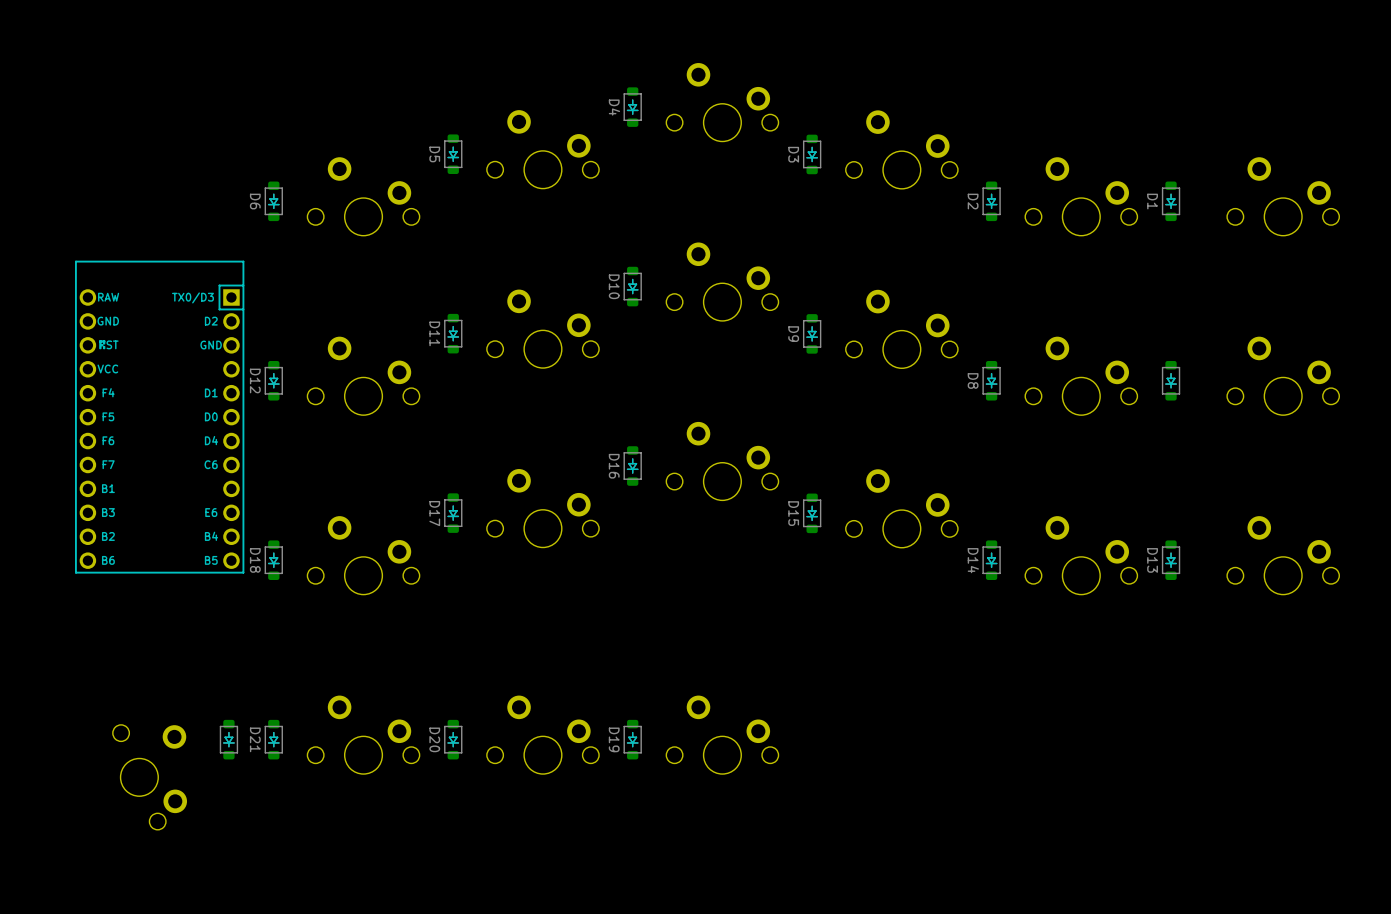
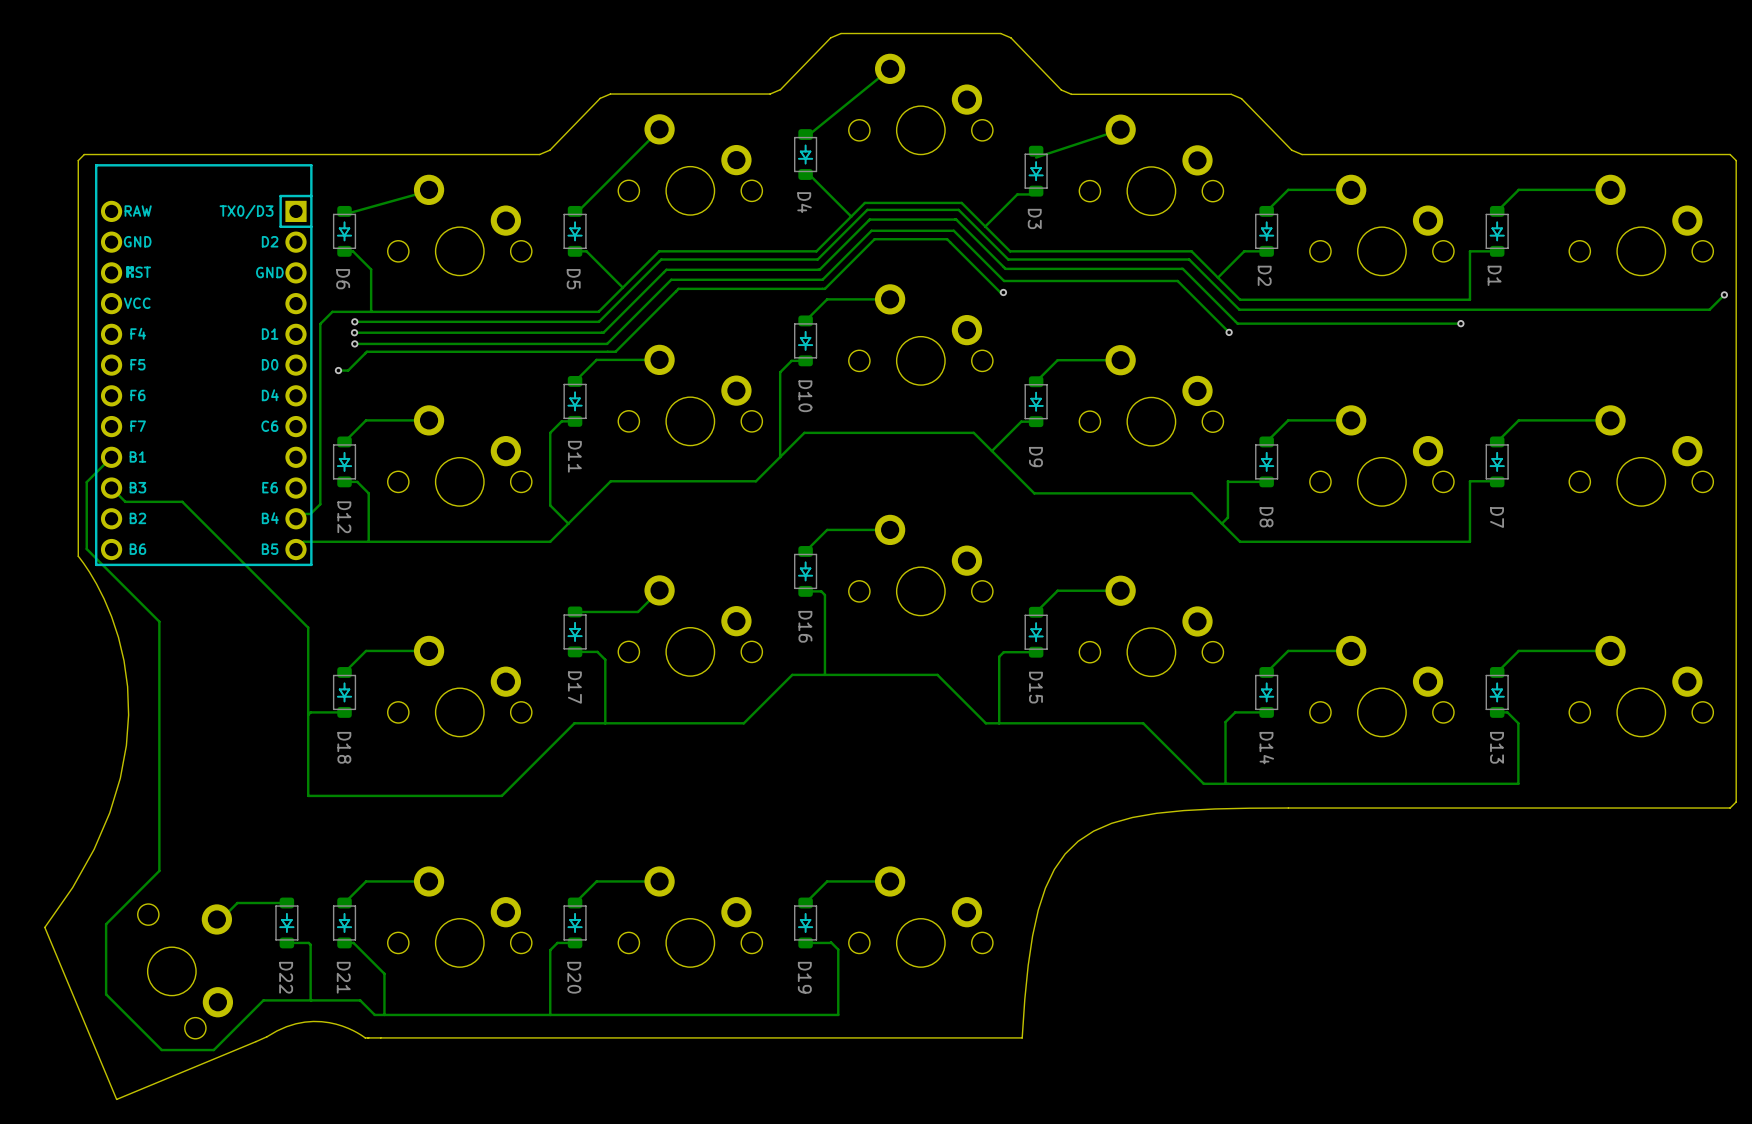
board edge: none -> (1000, 33) (1010, 37) (1061, 89) (1071, 94) (1231, 94) (1241, 98) (1291, 150) (1302, 154) (1730, 154) (1736, 160) (1736, 801) (1730, 808) (1214, 808) (1156, 813) (1111, 823) (1093, 831) (1078, 841) (1065, 853) (1054, 869) (1045, 888) (1032, 935) (1022, 1037) (365, 1037) (342, 1026) (313, 1021) (286, 1026) (256, 1041) (116, 1099) (44, 927) (72, 887) (94, 849) (109, 812) (120, 778) (126, 745) (128, 714) (127, 686) (118, 637) (104, 598) (78, 556) (78, 160) (84, 154) (539, 154) (549, 150) (600, 98) (610, 94) (770, 94) (780, 89) (830, 37) (840, 33) (1000, 33)
track: none -> (889, 69) (805, 137)
D4 name position: D4 (614, 107) -> D4 (804, 202)
D4 position: (632, 107) -> (805, 154)
track: none -> (659, 130) (574, 215)
track: none -> (1119, 130) (1036, 157)
D5 name position: D5 (434, 154) -> D5 (573, 279)
D5 position: (453, 154) -> (575, 231)
D3 name position: D3 (793, 154) -> D3 (1034, 218)
track: none -> (805, 174) (809, 174) (851, 216)
track: none -> (429, 190) (344, 214)
track: none -> (1351, 189) (1288, 189) (1266, 211)
track: none -> (1610, 189) (1518, 189) (1497, 211)
track: none -> (1036, 194) (1017, 194) (985, 226)
D6 name position: D6 (255, 201) -> D6 (343, 279)
D2 name position: D2 (973, 201) -> D2 (1264, 275)
D1 name position: D1 (1152, 201) -> D1 (1494, 275)
track: none -> (344, 251) (352, 251) (371, 269) (371, 311)
track: none -> (575, 251) (586, 251) (622, 287)
track: none -> (1497, 251) (1469, 251) (1469, 299) (1240, 299) (1191, 251) (1010, 251) (961, 202) (864, 202) (816, 251) (659, 251) (598, 311) (332, 311) (320, 323) (320, 504) (310, 513) (300, 513) (295, 518)
track: none -> (1266, 253) (1266, 251) (1244, 251) (1217, 277)
track: none -> (1003, 292) (1000, 292) (947, 239) (874, 239) (824, 288) (678, 288) (615, 351) (366, 351) (348, 370) (338, 370)
via: none -> (1003, 292)
track: none -> (1724, 294) (1709, 309) (1239, 309) (1189, 259) (1008, 259) (958, 209) (867, 209) (817, 259) (661, 259) (598, 321) (354, 321)
via: none -> (1724, 294)
track: none -> (890, 299) (827, 299) (805, 320)
via: none -> (354, 321)
track: none -> (1460, 323) (1237, 323) (1182, 268) (1005, 268) (956, 219) (869, 219) (819, 269) (666, 269) (603, 332) (354, 332)
via: none -> (1460, 323)
track: none -> (1229, 332) (1177, 280) (1004, 280) (953, 230) (871, 230) (822, 279) (671, 279) (607, 343) (354, 343)
via: none -> (1229, 332)
via: none -> (354, 332)
D10 name position: D10 (614, 286) -> D10 (805, 396)
via: none -> (354, 343)
track: none -> (659, 359) (596, 359) (575, 381)
track: none -> (1120, 360) (1057, 360) (1036, 381)
track: none -> (805, 360) (791, 360) (780, 372) (780, 457)
via: none -> (338, 370)
D11 name position: D11 (434, 333) -> D11 (574, 456)
D9 name position: D9 (793, 334) -> D9 (1035, 457)
track: none -> (429, 420) (366, 420) (344, 441)
track: none -> (1351, 420) (1288, 420) (1266, 441)
track: none -> (1610, 420) (1518, 420) (1497, 441)
track: none -> (575, 421) (561, 421) (550, 432) (550, 505) (568, 523)
track: none -> (1036, 421) (1021, 421) (991, 451)
track: none -> (111, 457) (86, 482) (86, 549) (159, 621) (159, 870) (106, 924) (106, 994) (161, 1050) (213, 1050) (263, 1000) (360, 1000) (374, 1014) (838, 1014) (838, 949) (831, 942) (805, 942)
D12 name position: D12 (255, 380) -> D12 (344, 517)
D8 name position: D8 (973, 380) -> D8 (1266, 517)
track: none -> (1497, 481) (1469, 481) (1469, 541) (1240, 541) (1191, 493) (1034, 493) (973, 432) (804, 432) (755, 481) (610, 481) (550, 541) (303, 541) (295, 549)
track: none -> (344, 481) (357, 481) (368, 493) (368, 541)
track: none -> (1266, 481) (1227, 481) (1227, 517) (1221, 523)
track: none -> (116, 488) (111, 488) (125, 501) (182, 501) (308, 627) (308, 795) (501, 795) (574, 723) (743, 723) (792, 674) (937, 674) (985, 723) (1143, 723) (1203, 783) (1518, 783) (1518, 723) (1507, 712) (1497, 712)
part position: (159, 417) -> (203, 365)
D7 name: none -> D7 (1497, 517)
track: none -> (890, 529) (827, 529) (805, 551)
D16 name position: D16 (614, 466) -> D16 (805, 626)
track: none -> (659, 590) (638, 611) (575, 611)
track: none -> (805, 591) (821, 591) (824, 595) (824, 674)
track: none -> (1120, 590) (1057, 590) (1036, 612)
D17 name position: D17 (434, 513) -> D17 (574, 687)
D15 name position: D15 (793, 513) -> D15 (1035, 687)
track: none -> (429, 650) (366, 650) (344, 672)
track: none -> (1351, 650) (1288, 650) (1266, 672)
track: none -> (1610, 650) (1518, 650) (1497, 672)
track: none -> (575, 651) (597, 651) (605, 659) (605, 723)
track: none -> (1036, 652) (1003, 652) (999, 656) (999, 723)
D18 name position: D18 (255, 560) -> D18 (344, 747)
D14 name position: D14 (973, 560) -> D14 (1266, 748)
D13 name position: D13 (1152, 560) -> D13 (1497, 747)
track: none -> (344, 712) (310, 712) (308, 714)
track: none -> (1266, 712) (1235, 712) (1225, 722) (1225, 783)
track: none -> (429, 881) (366, 881) (344, 903)
track: none -> (659, 881) (596, 881) (575, 903)
track: none -> (890, 881) (827, 881) (805, 903)
track: none -> (286, 903) (237, 903) (220, 919) (216, 919)
D21 name position: D21 (255, 739) -> D21 (343, 977)
D20 name position: D20 (434, 739) -> D20 (574, 977)
D19 name position: D19 (614, 739) -> D19 (804, 977)
track: none -> (286, 942) (308, 942) (310, 944) (311, 1000)
track: none -> (344, 942) (353, 942) (384, 973) (384, 1014)
track: none -> (575, 942) (557, 942) (550, 950) (550, 1014)
D22 name: none -> D22 (286, 977)

